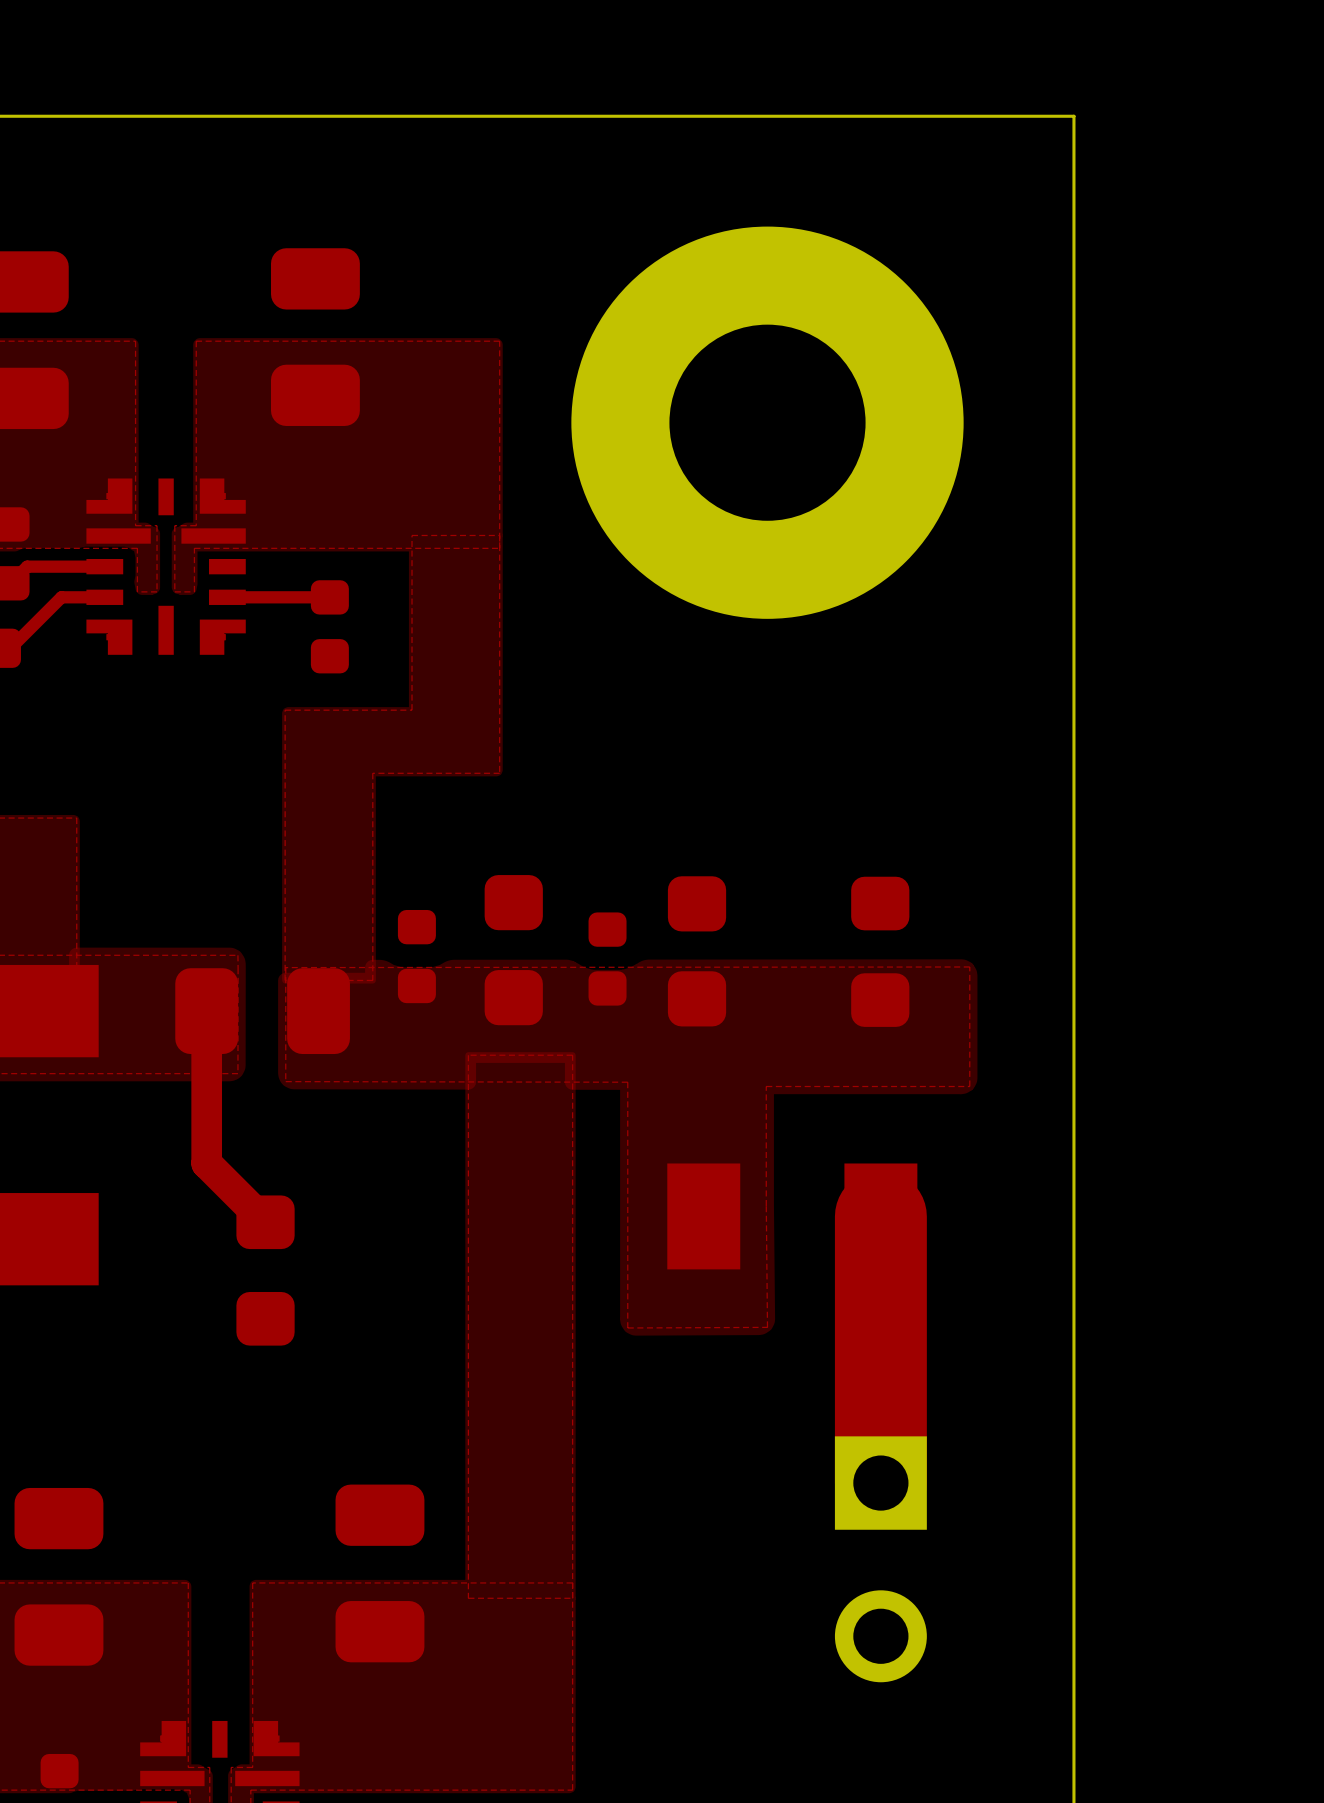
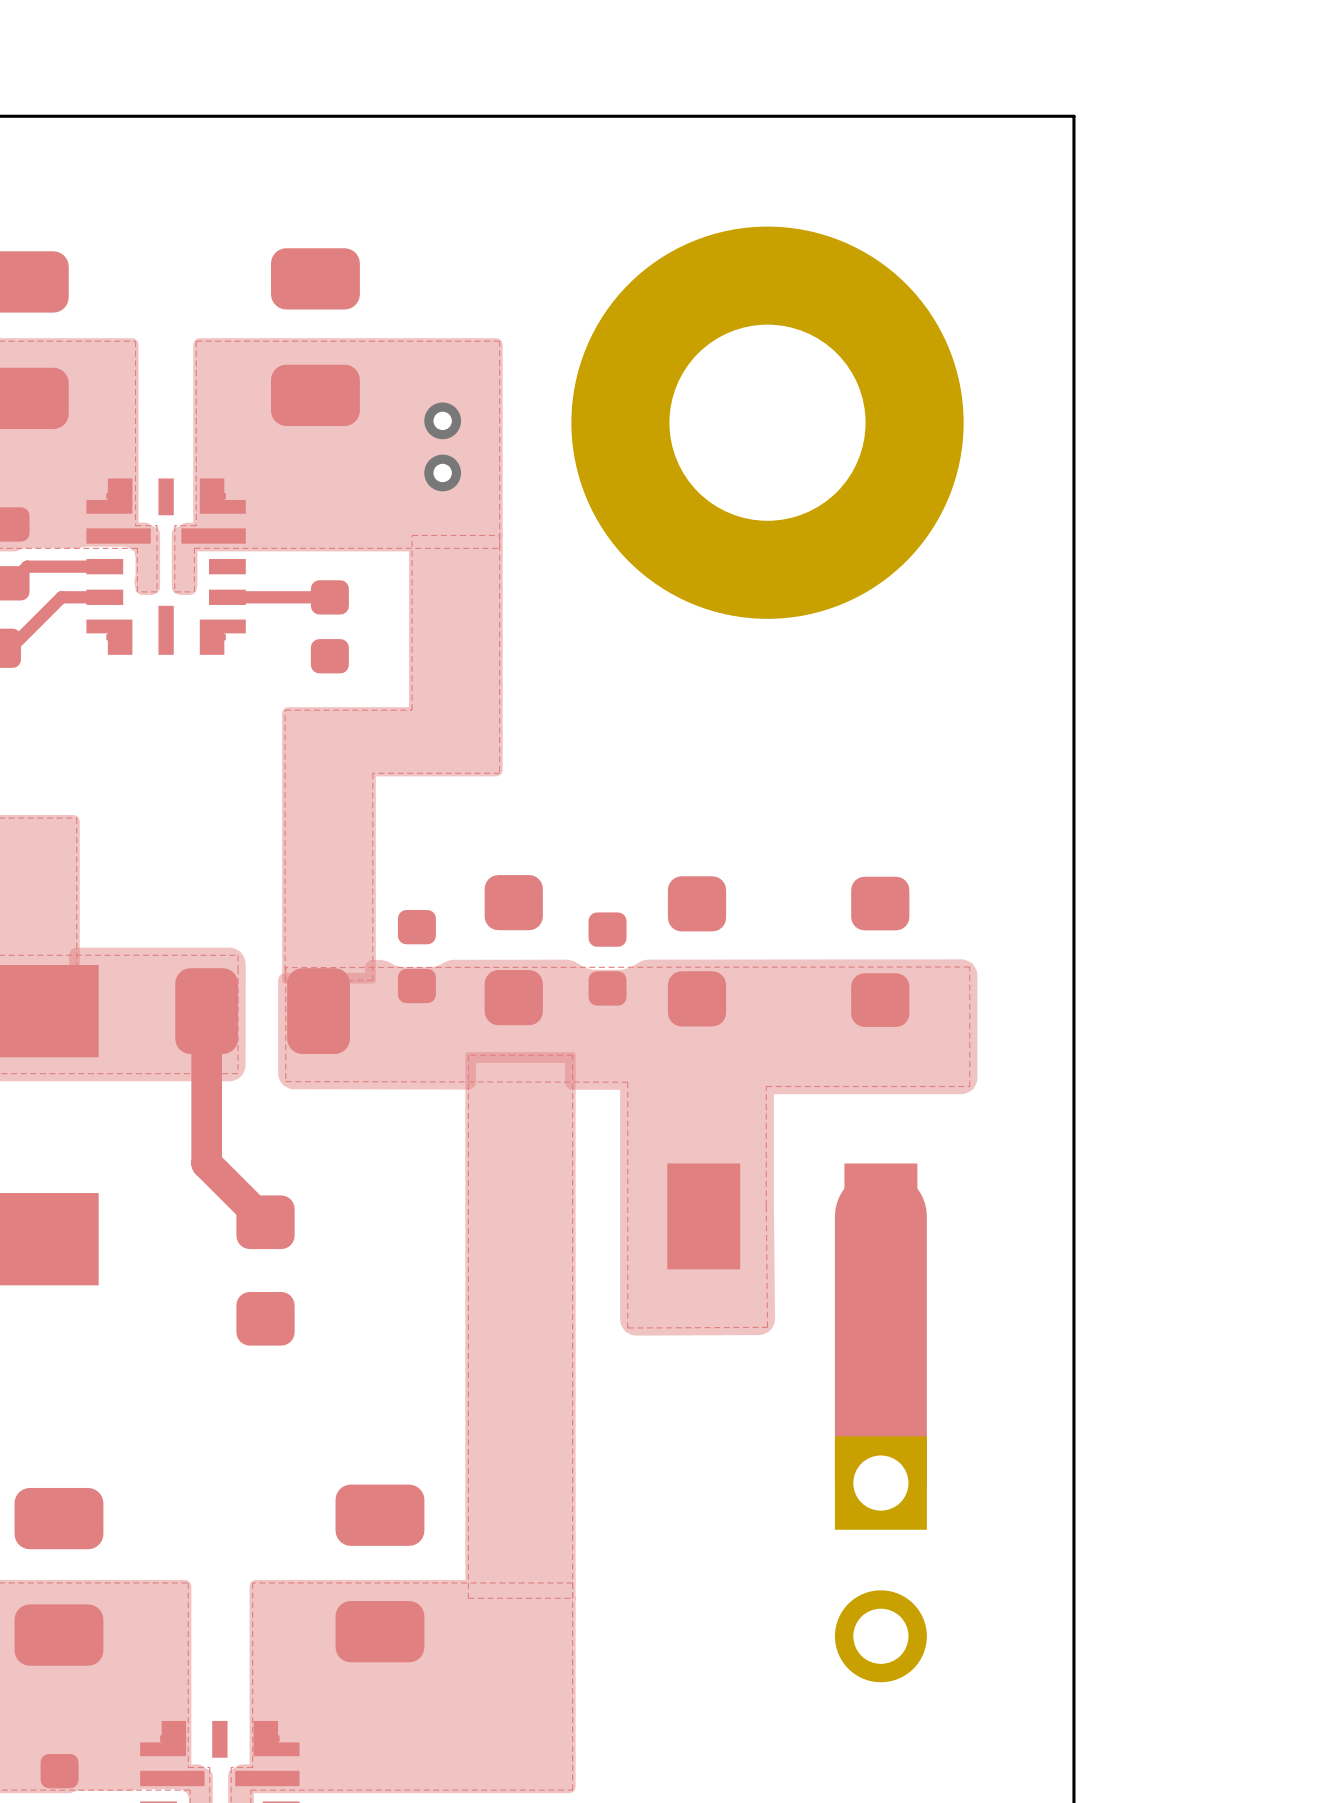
via: none -> (442, 420)
via: none -> (442, 472)

